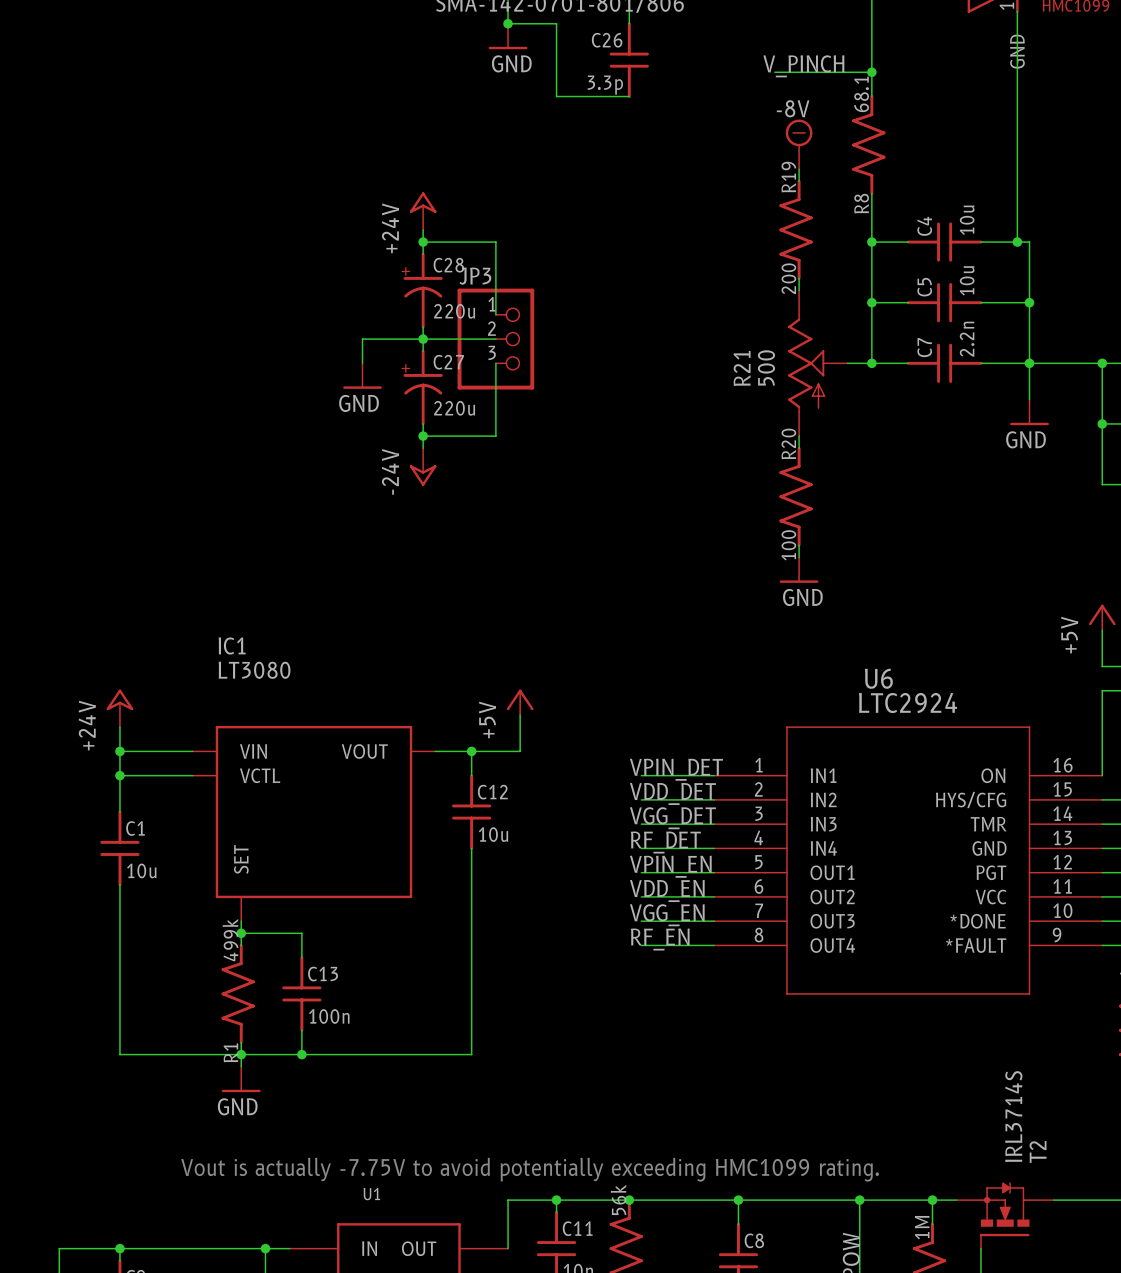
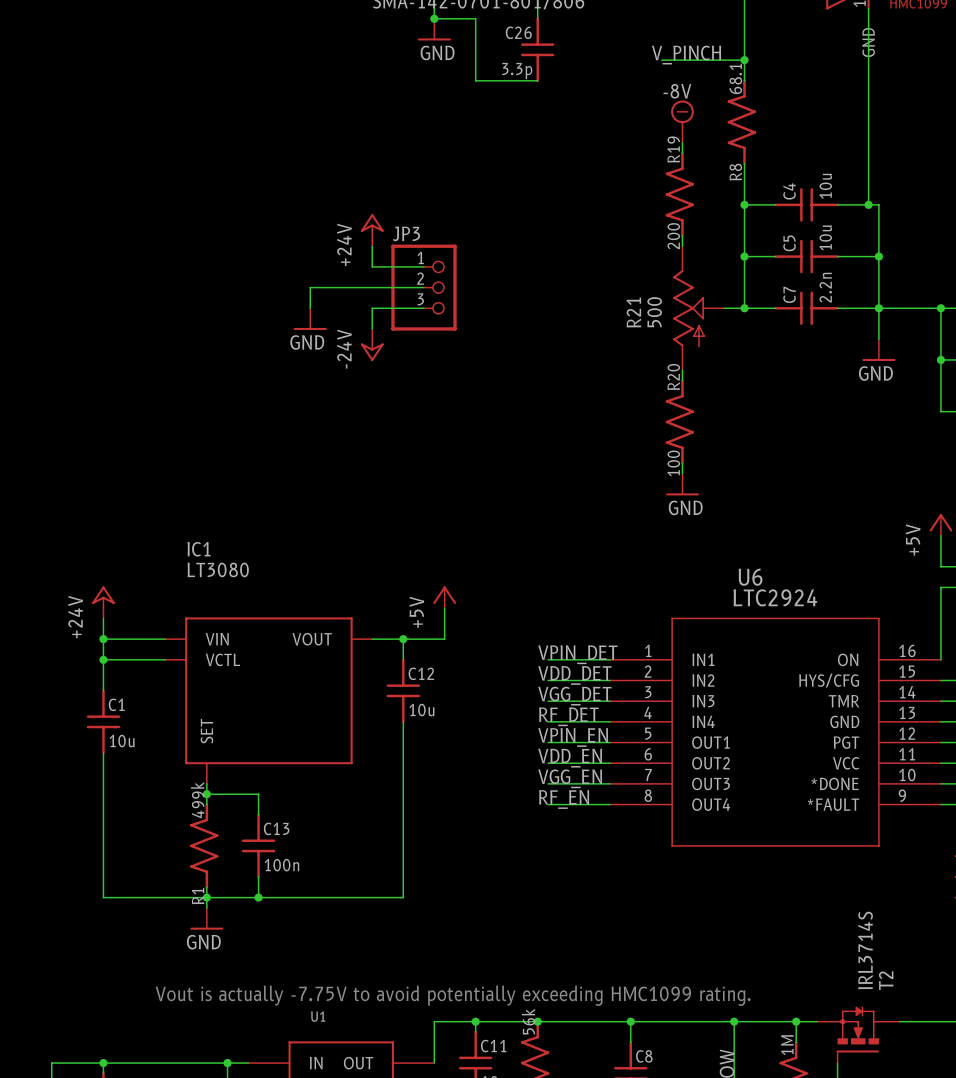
power symbol position: +24V (423, 211) -> +24V (372, 230)
wire: (423, 229) (423, 254) -> none
wire: (423, 242) (495, 242) (495, 314) -> (372, 246) (372, 266) (423, 266)
junction: (423, 242) -> none
C28: 220u (422, 290) -> none
wire: (423, 326) (423, 351) -> none
junction: (423, 339) -> none
wire: (495, 363) (495, 436) (423, 436) -> (423, 308) (372, 308) (372, 328)
C27: 220u (422, 387) -> none
wire: (423, 423) (423, 448) -> none
junction: (423, 436) -> none
power symbol position: -24V (423, 467) -> -24V (372, 344)

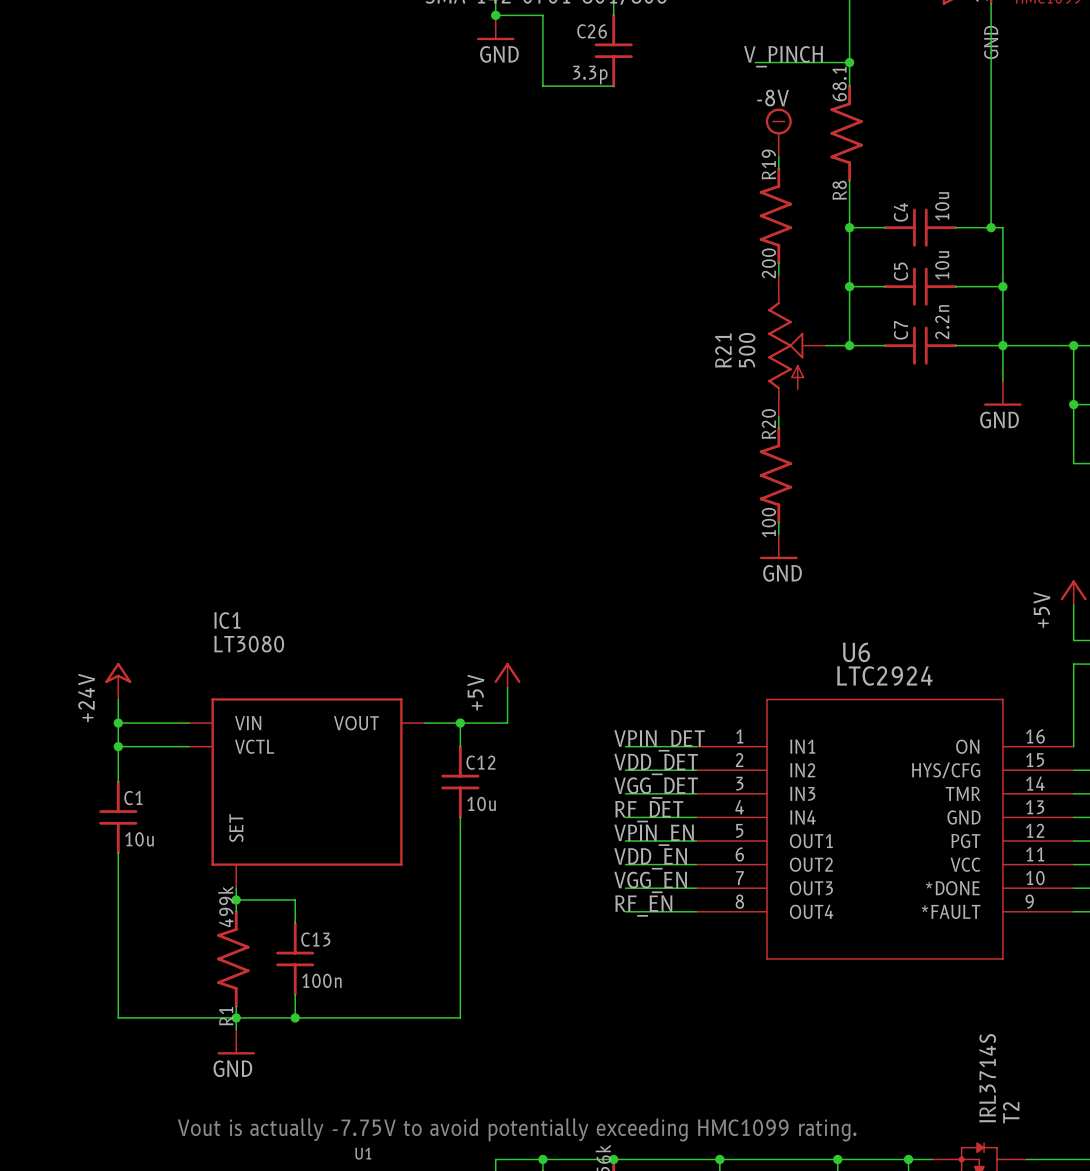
power symbol: +24V (372, 230) -> none
wire: (372, 246) (372, 266) (423, 266) -> none
wire: (423, 287) (310, 287) (310, 308) -> none
JP3: (423, 287) -> none
wire: (423, 308) (372, 308) (372, 328) -> none
power symbol: GND (310, 319) -> none
power symbol: -24V (372, 344) -> none

